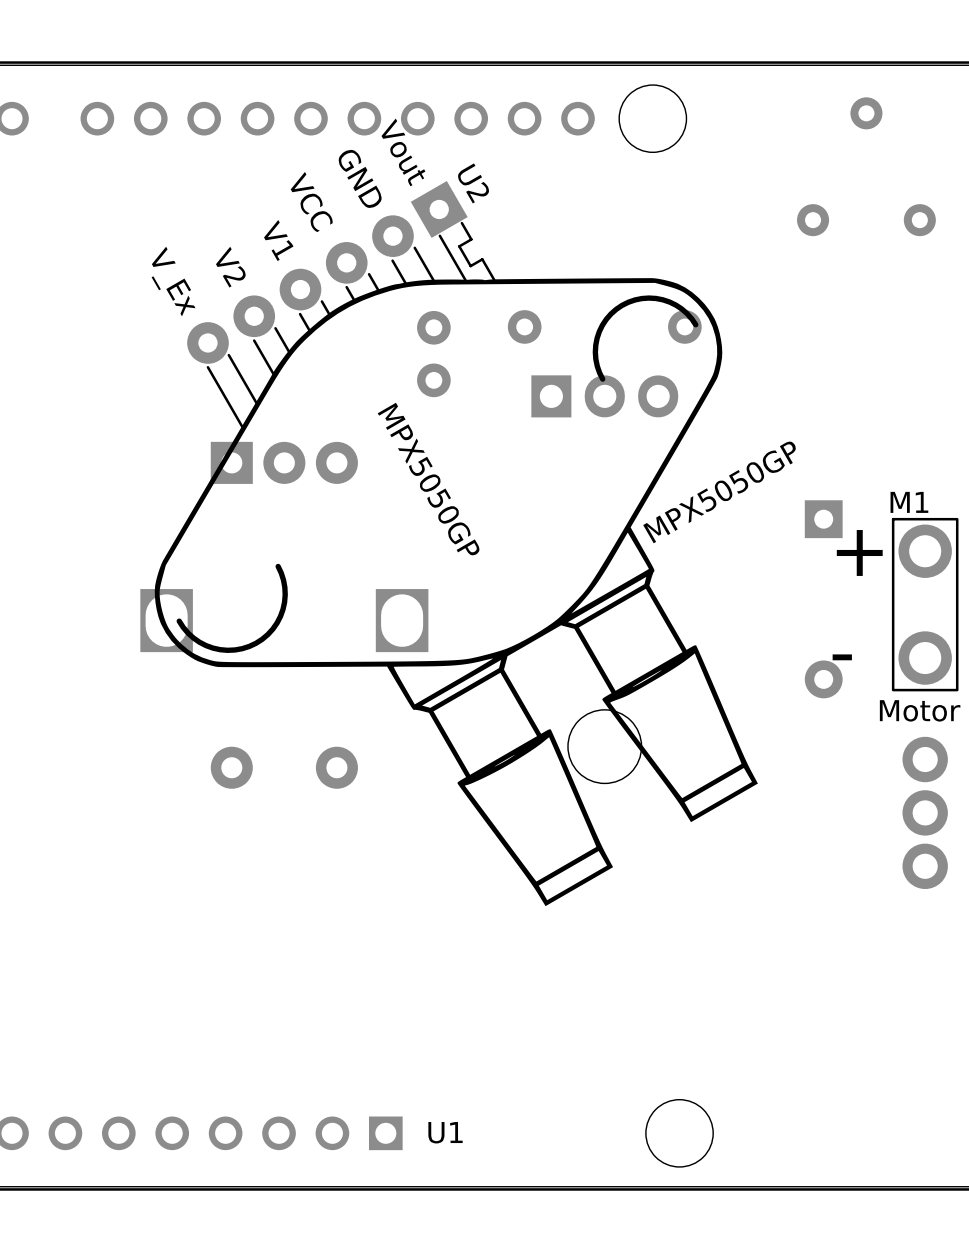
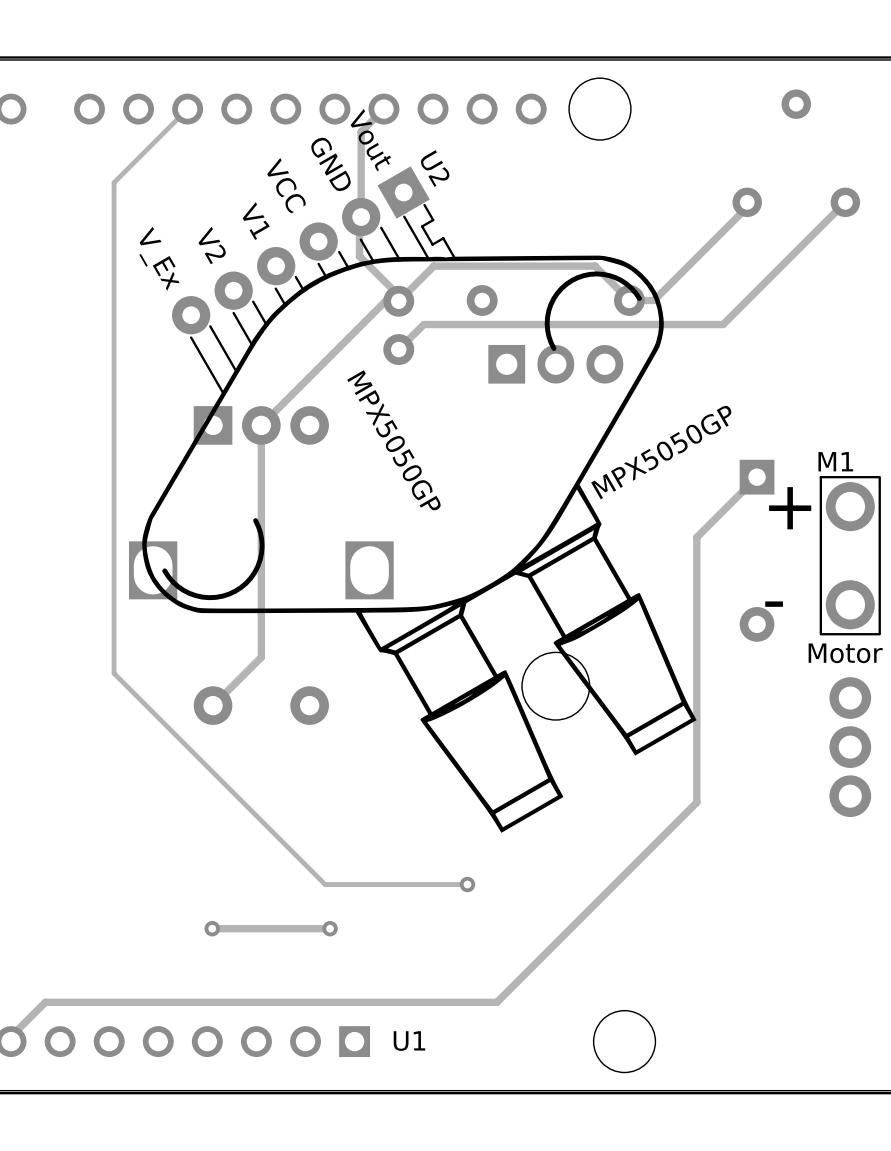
track: none -> (187, 109) (114, 182) (114, 673) (325, 884) (467, 884)
track: none -> (383, 109) (361, 131) (359, 256) (398, 295) (398, 301)
track: none -> (747, 202) (747, 207) (653, 300) (629, 300) (595, 266) (433, 266) (398, 301)
track: none -> (845, 202) (723, 324) (423, 324) (398, 349)
track: none -> (398, 301) (385, 301) (261, 425) (261, 657) (213, 705)
track: none -> (757, 477) (696, 537) (696, 802) (496, 1002) (45, 1002) (11, 1036) (11, 1041)
via: none -> (467, 884)
via: none -> (212, 928)
track: none -> (330, 928) (212, 928)
via: none -> (330, 928)

